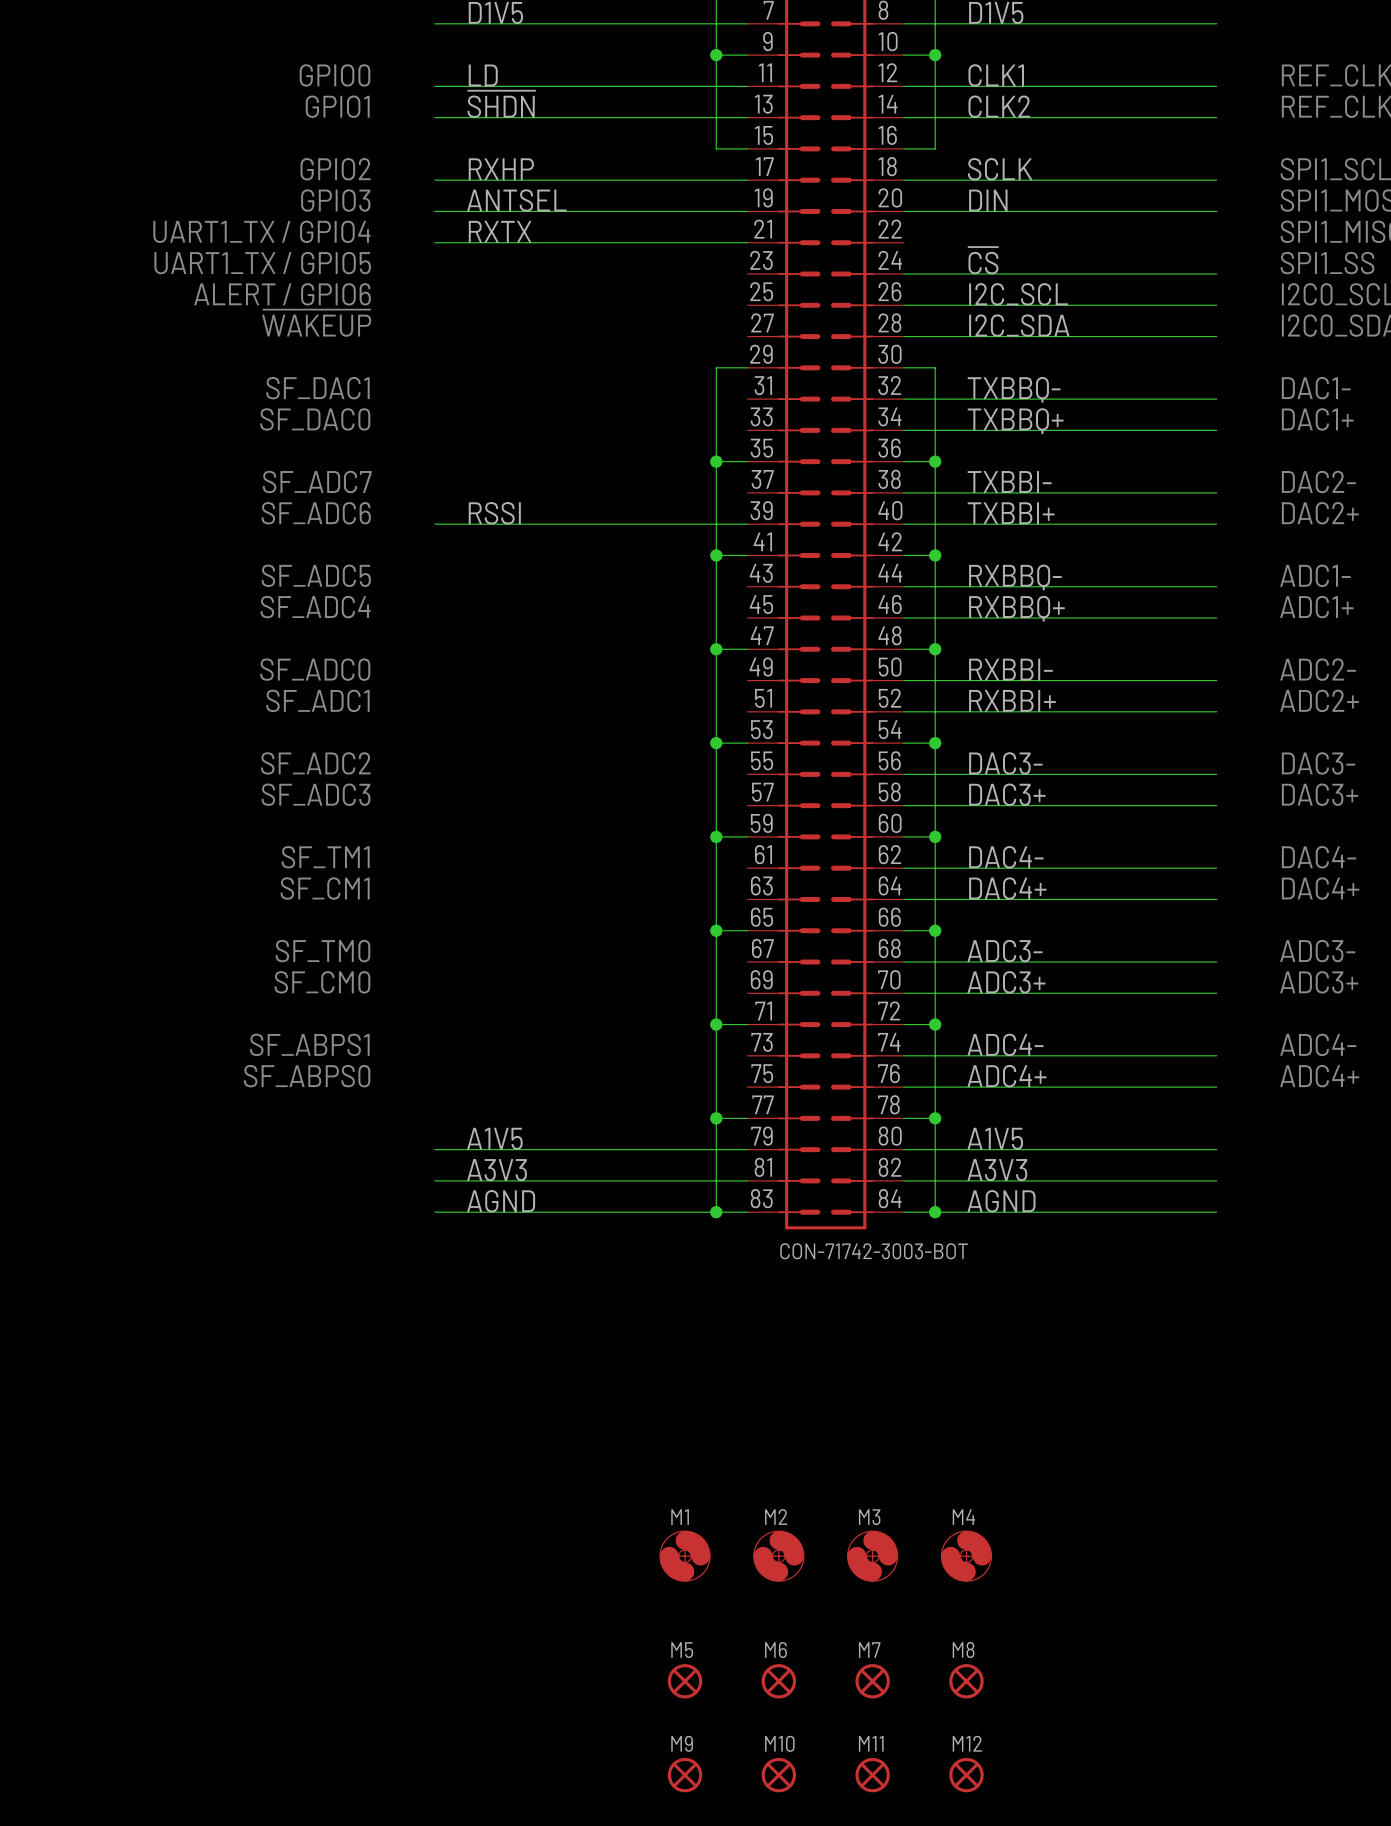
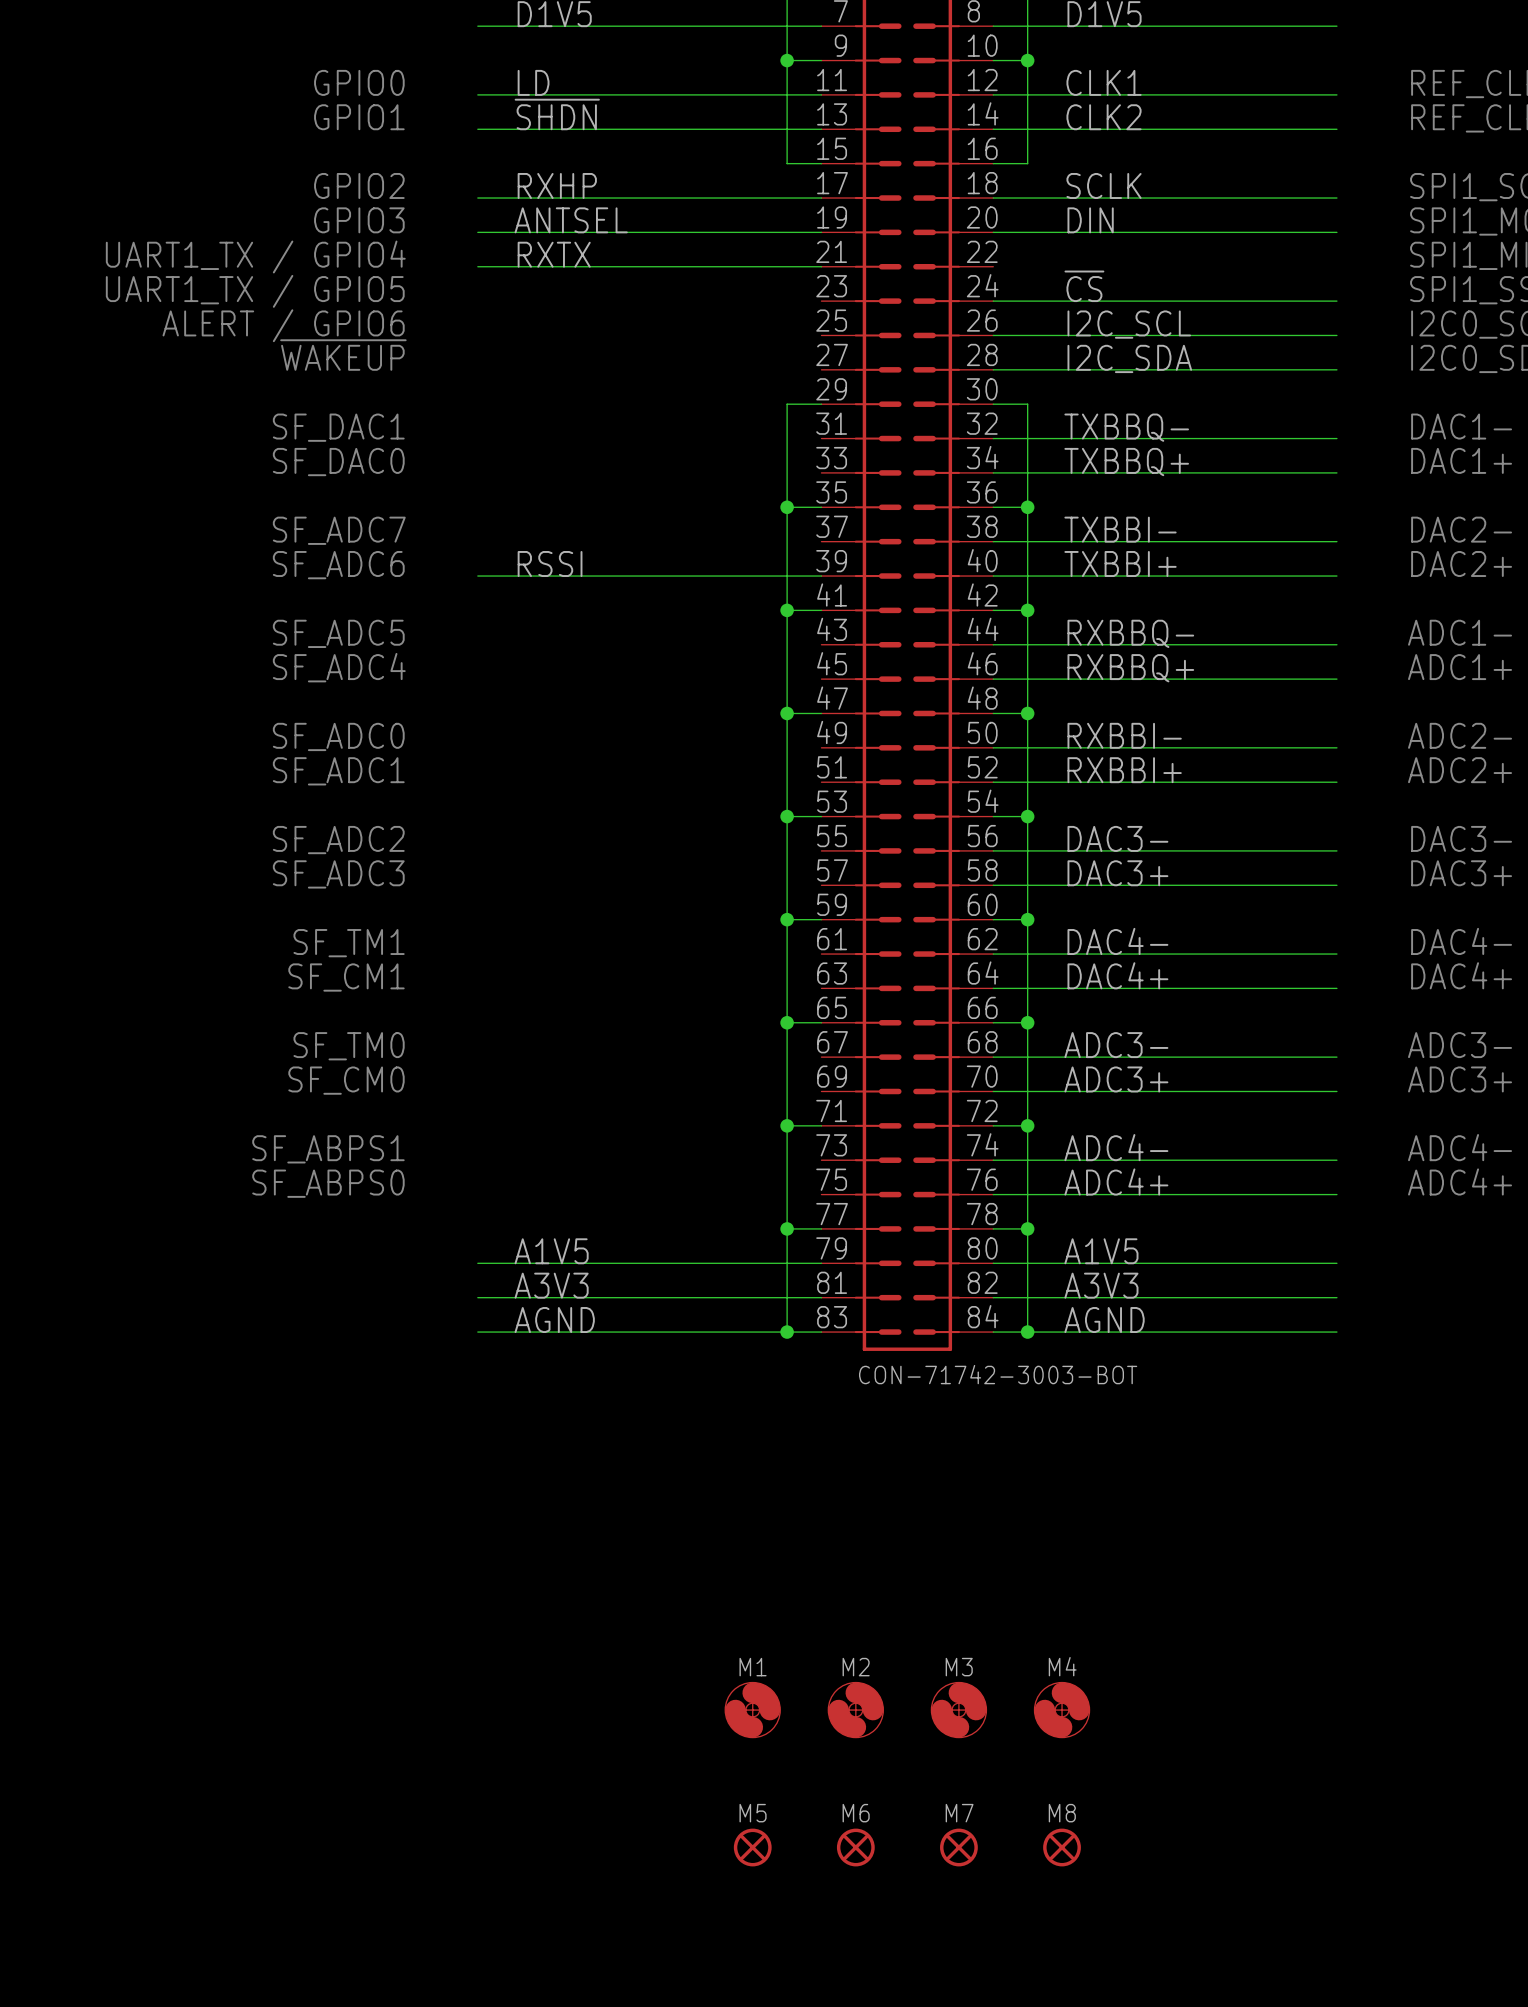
M9: (685, 1775) -> none
M10: (778, 1775) -> none
M11: (872, 1775) -> none
M12: (966, 1775) -> none

